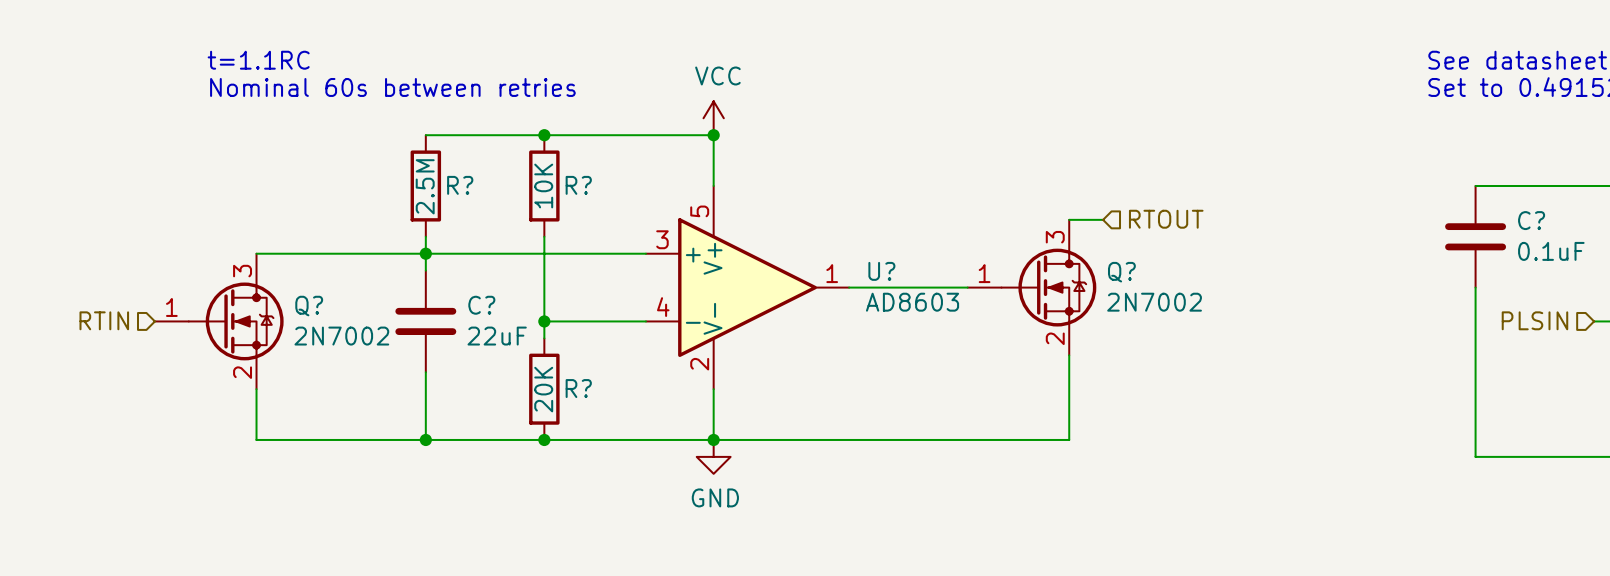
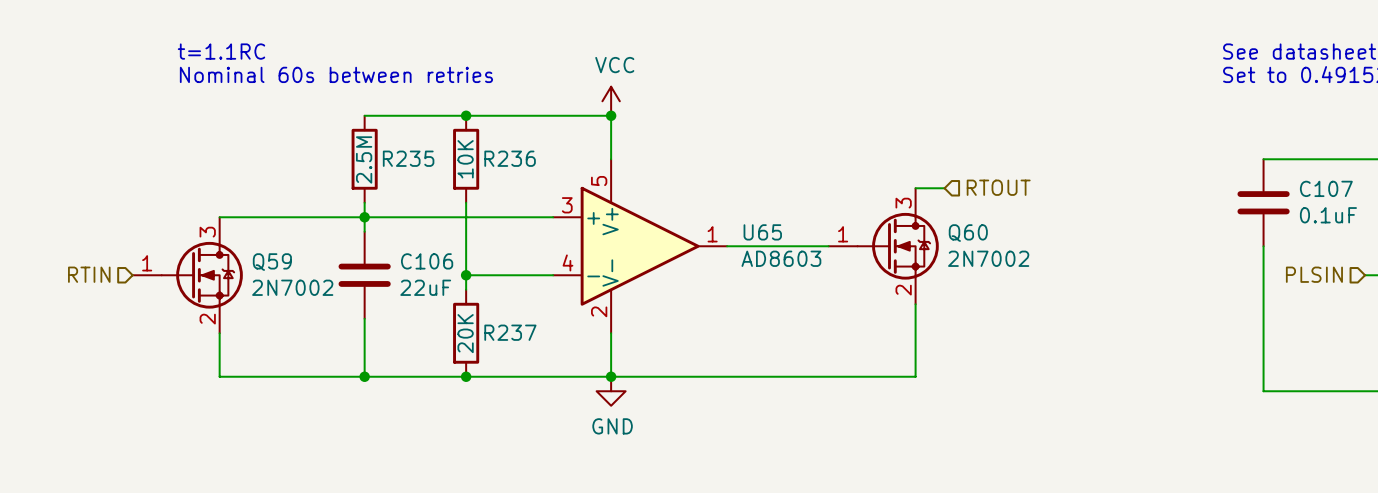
R? name: R? (460, 185) -> R235 (408, 158)
R? name: R? (578, 185) -> R236 (510, 158)
C? name: C? (1531, 220) -> C107 (1326, 188)
U? name: U? (881, 271) -> U65 (762, 232)
Q? name: Q? (1121, 272) -> Q60 (968, 233)
C? name: C? (481, 305) -> C106 (427, 261)
Q? name: Q? (309, 306) -> Q59 (272, 262)
R? name: R? (578, 388) -> R237 (510, 332)

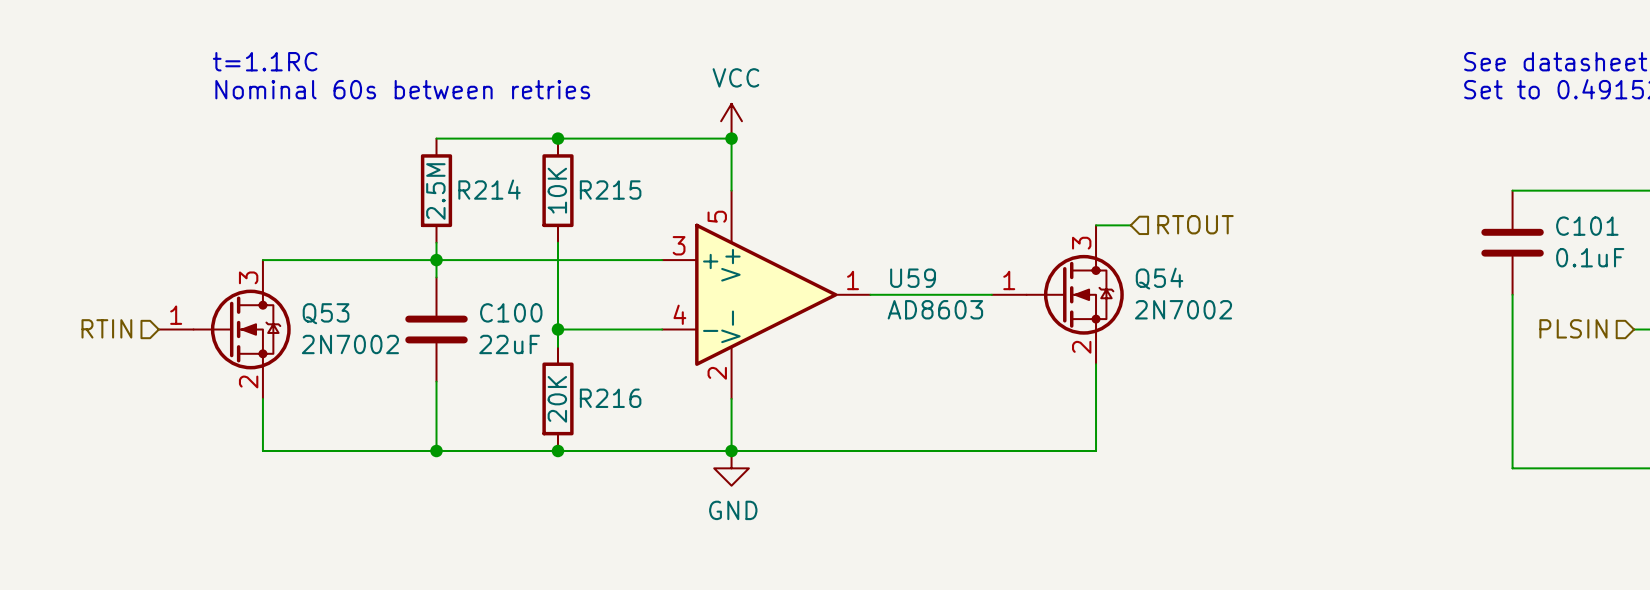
R235 name: R235 (408, 158) -> R214 (489, 189)
R236 name: R236 (510, 158) -> R215 (610, 190)
C107 name: C107 (1326, 188) -> C101 (1587, 226)
U65 name: U65 (762, 232) -> U59 (913, 278)
Q60 name: Q60 (968, 233) -> Q54 (1159, 278)
C106 name: C106 (427, 261) -> C100 (511, 312)
Q59 name: Q59 (272, 262) -> Q53 (326, 313)
R237 name: R237 (510, 332) -> R216 (610, 398)

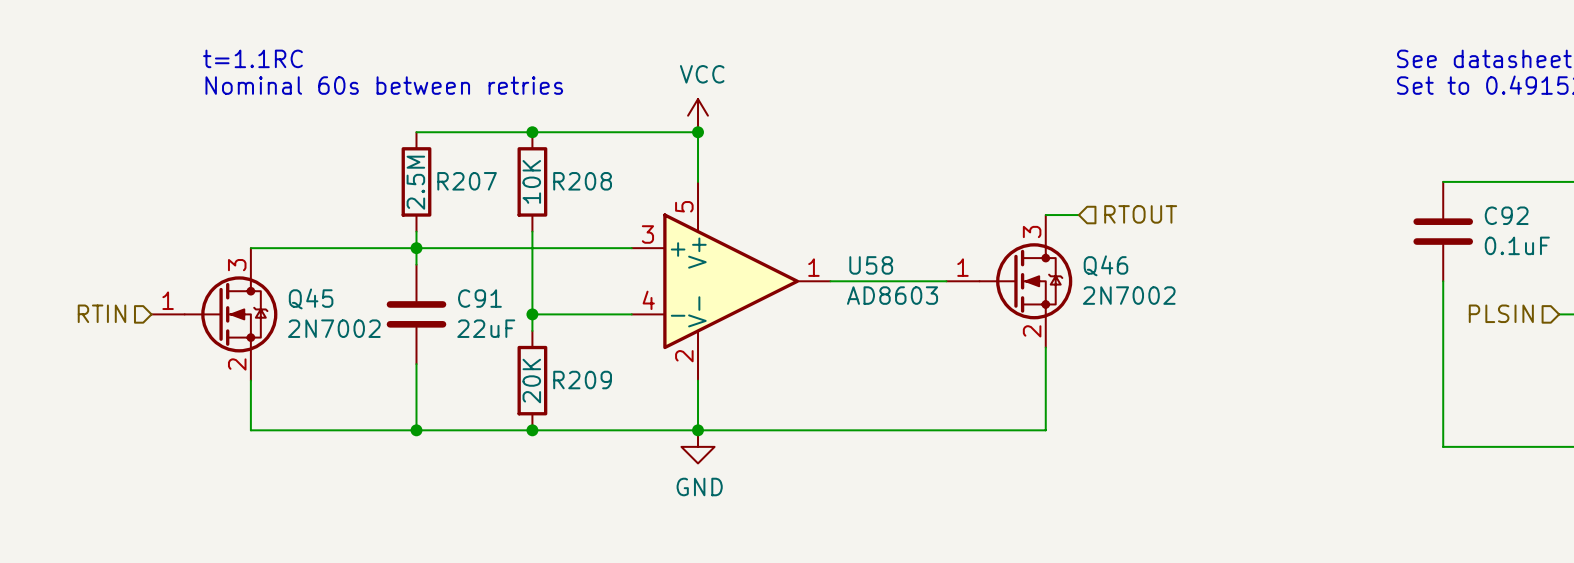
R214 name: R214 (489, 189) -> R207 (467, 181)
R215 name: R215 (610, 190) -> R208 (582, 181)
C101 name: C101 (1587, 226) -> C92 (1506, 215)
U59 name: U59 (913, 278) -> U58 (871, 265)
Q54 name: Q54 (1159, 278) -> Q46 (1105, 265)
C100 name: C100 (511, 312) -> C91 (479, 298)
Q53 name: Q53 (326, 313) -> Q45 (311, 298)
R216 name: R216 (610, 398) -> R209 (582, 380)

